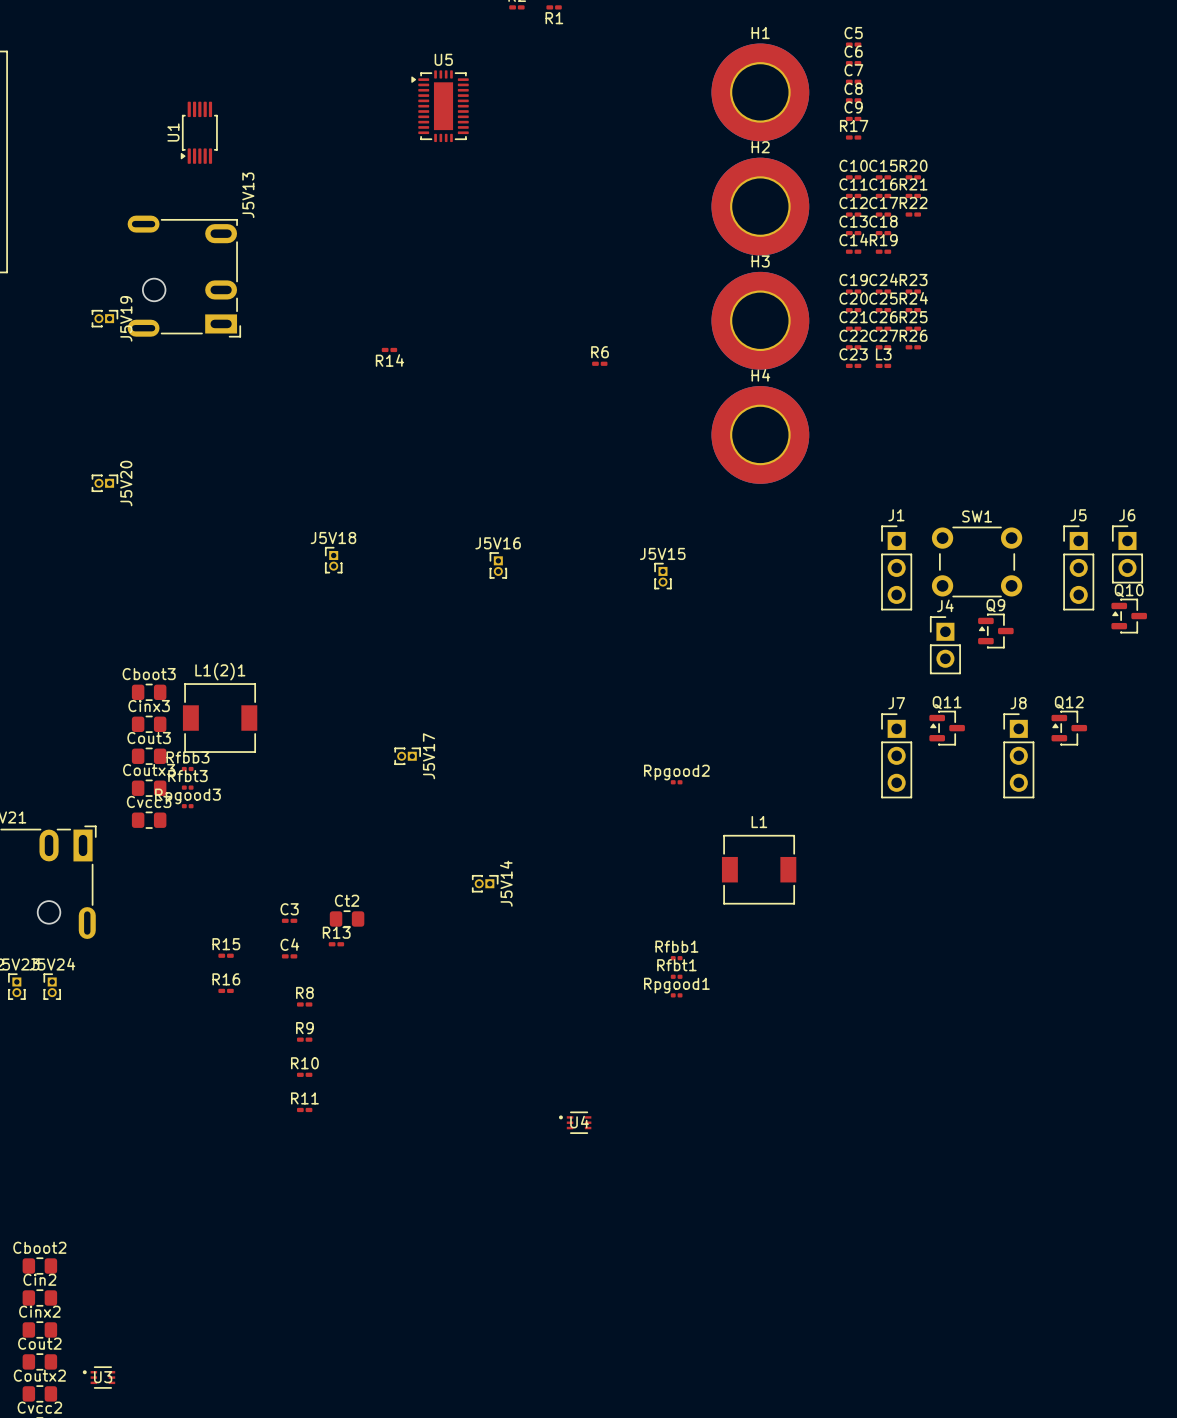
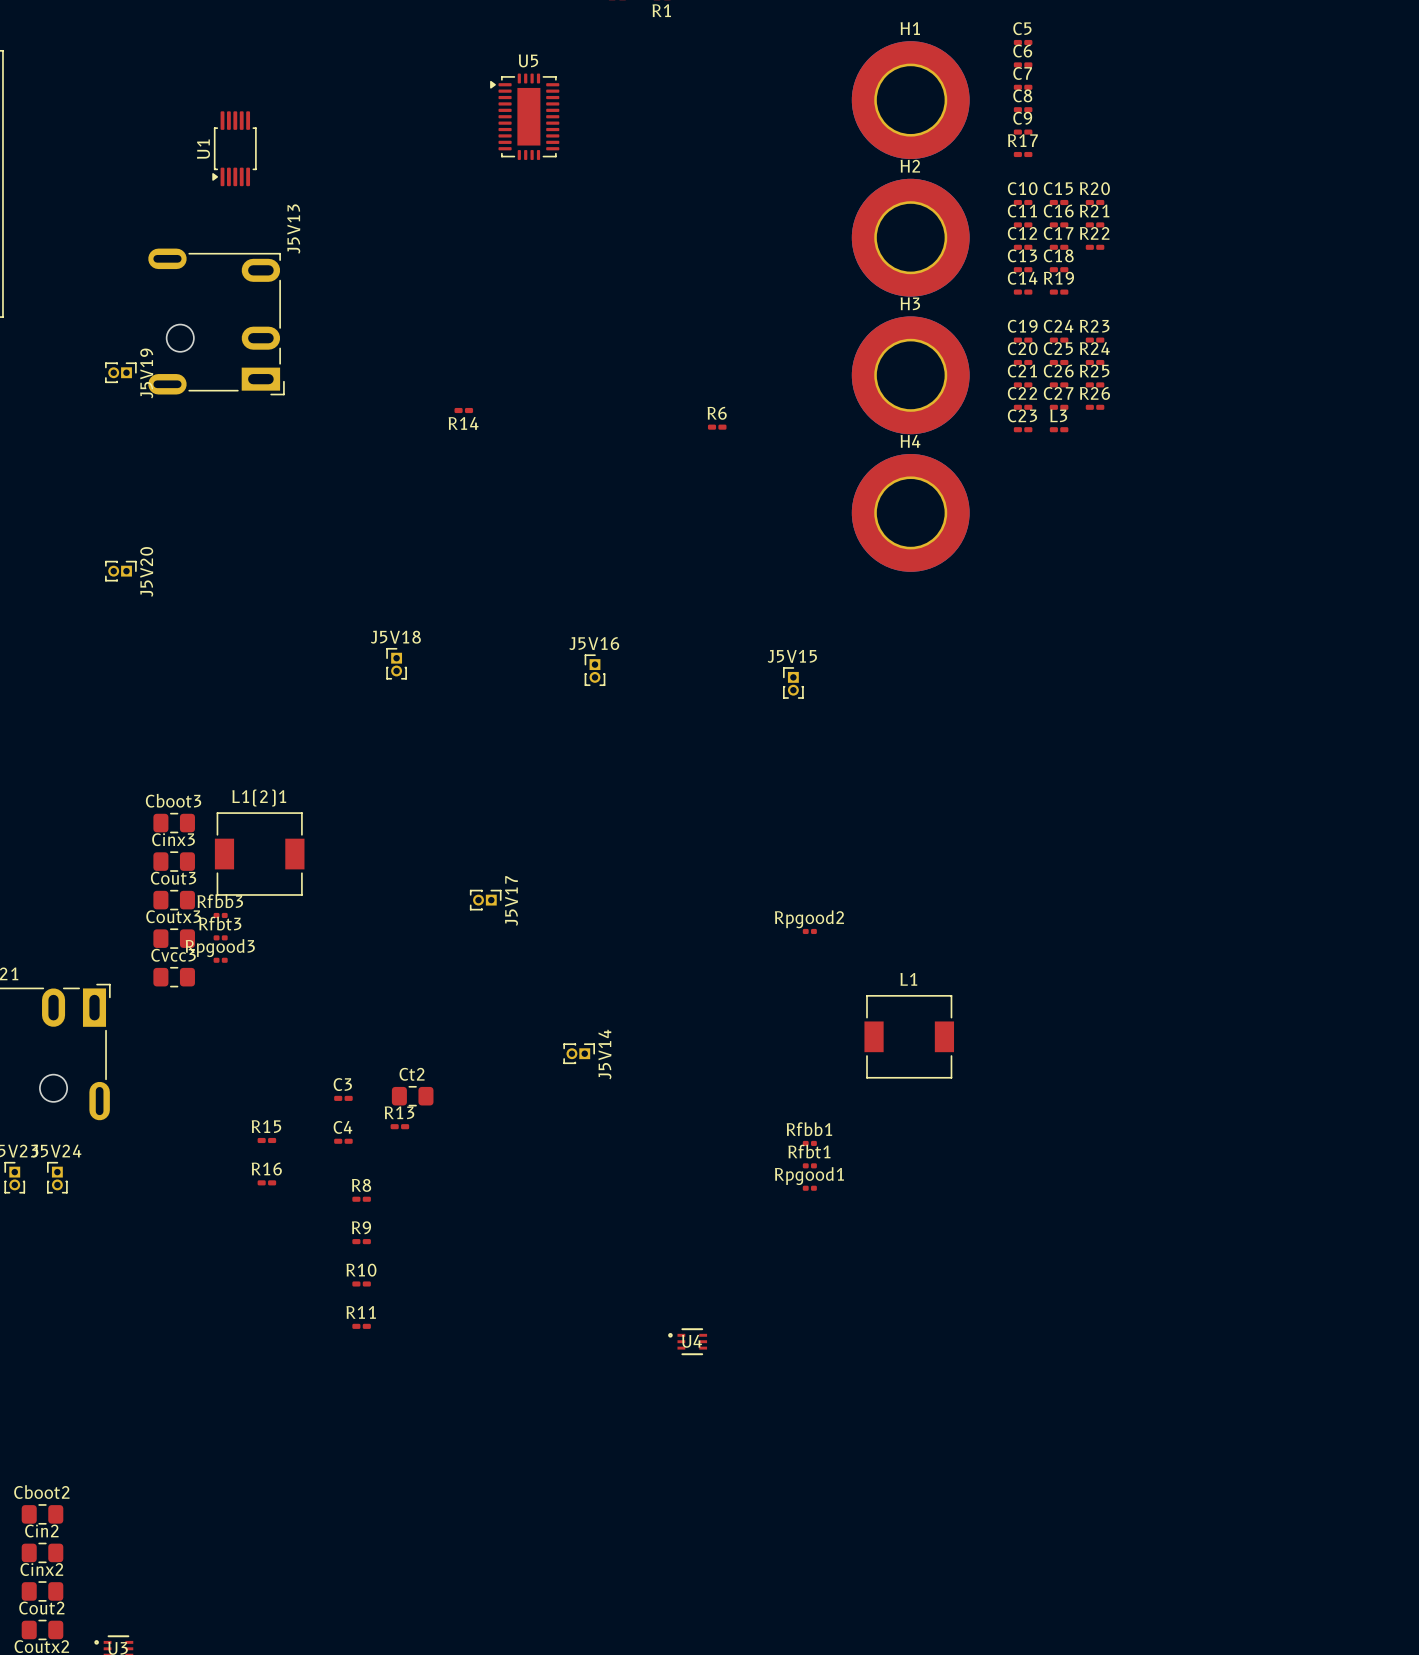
J6: (1127, 554) -> none
SW1: (977, 561) -> none
J1: (896, 567) -> none
J5: (1078, 567) -> none
Q10: (1129, 616) -> none
Q9: (995, 631) -> none
J4: (945, 645) -> none
Q11: (947, 728) -> none
Q12: (1069, 728) -> none
J7: (896, 755) -> none
J8: (1018, 755) -> none

